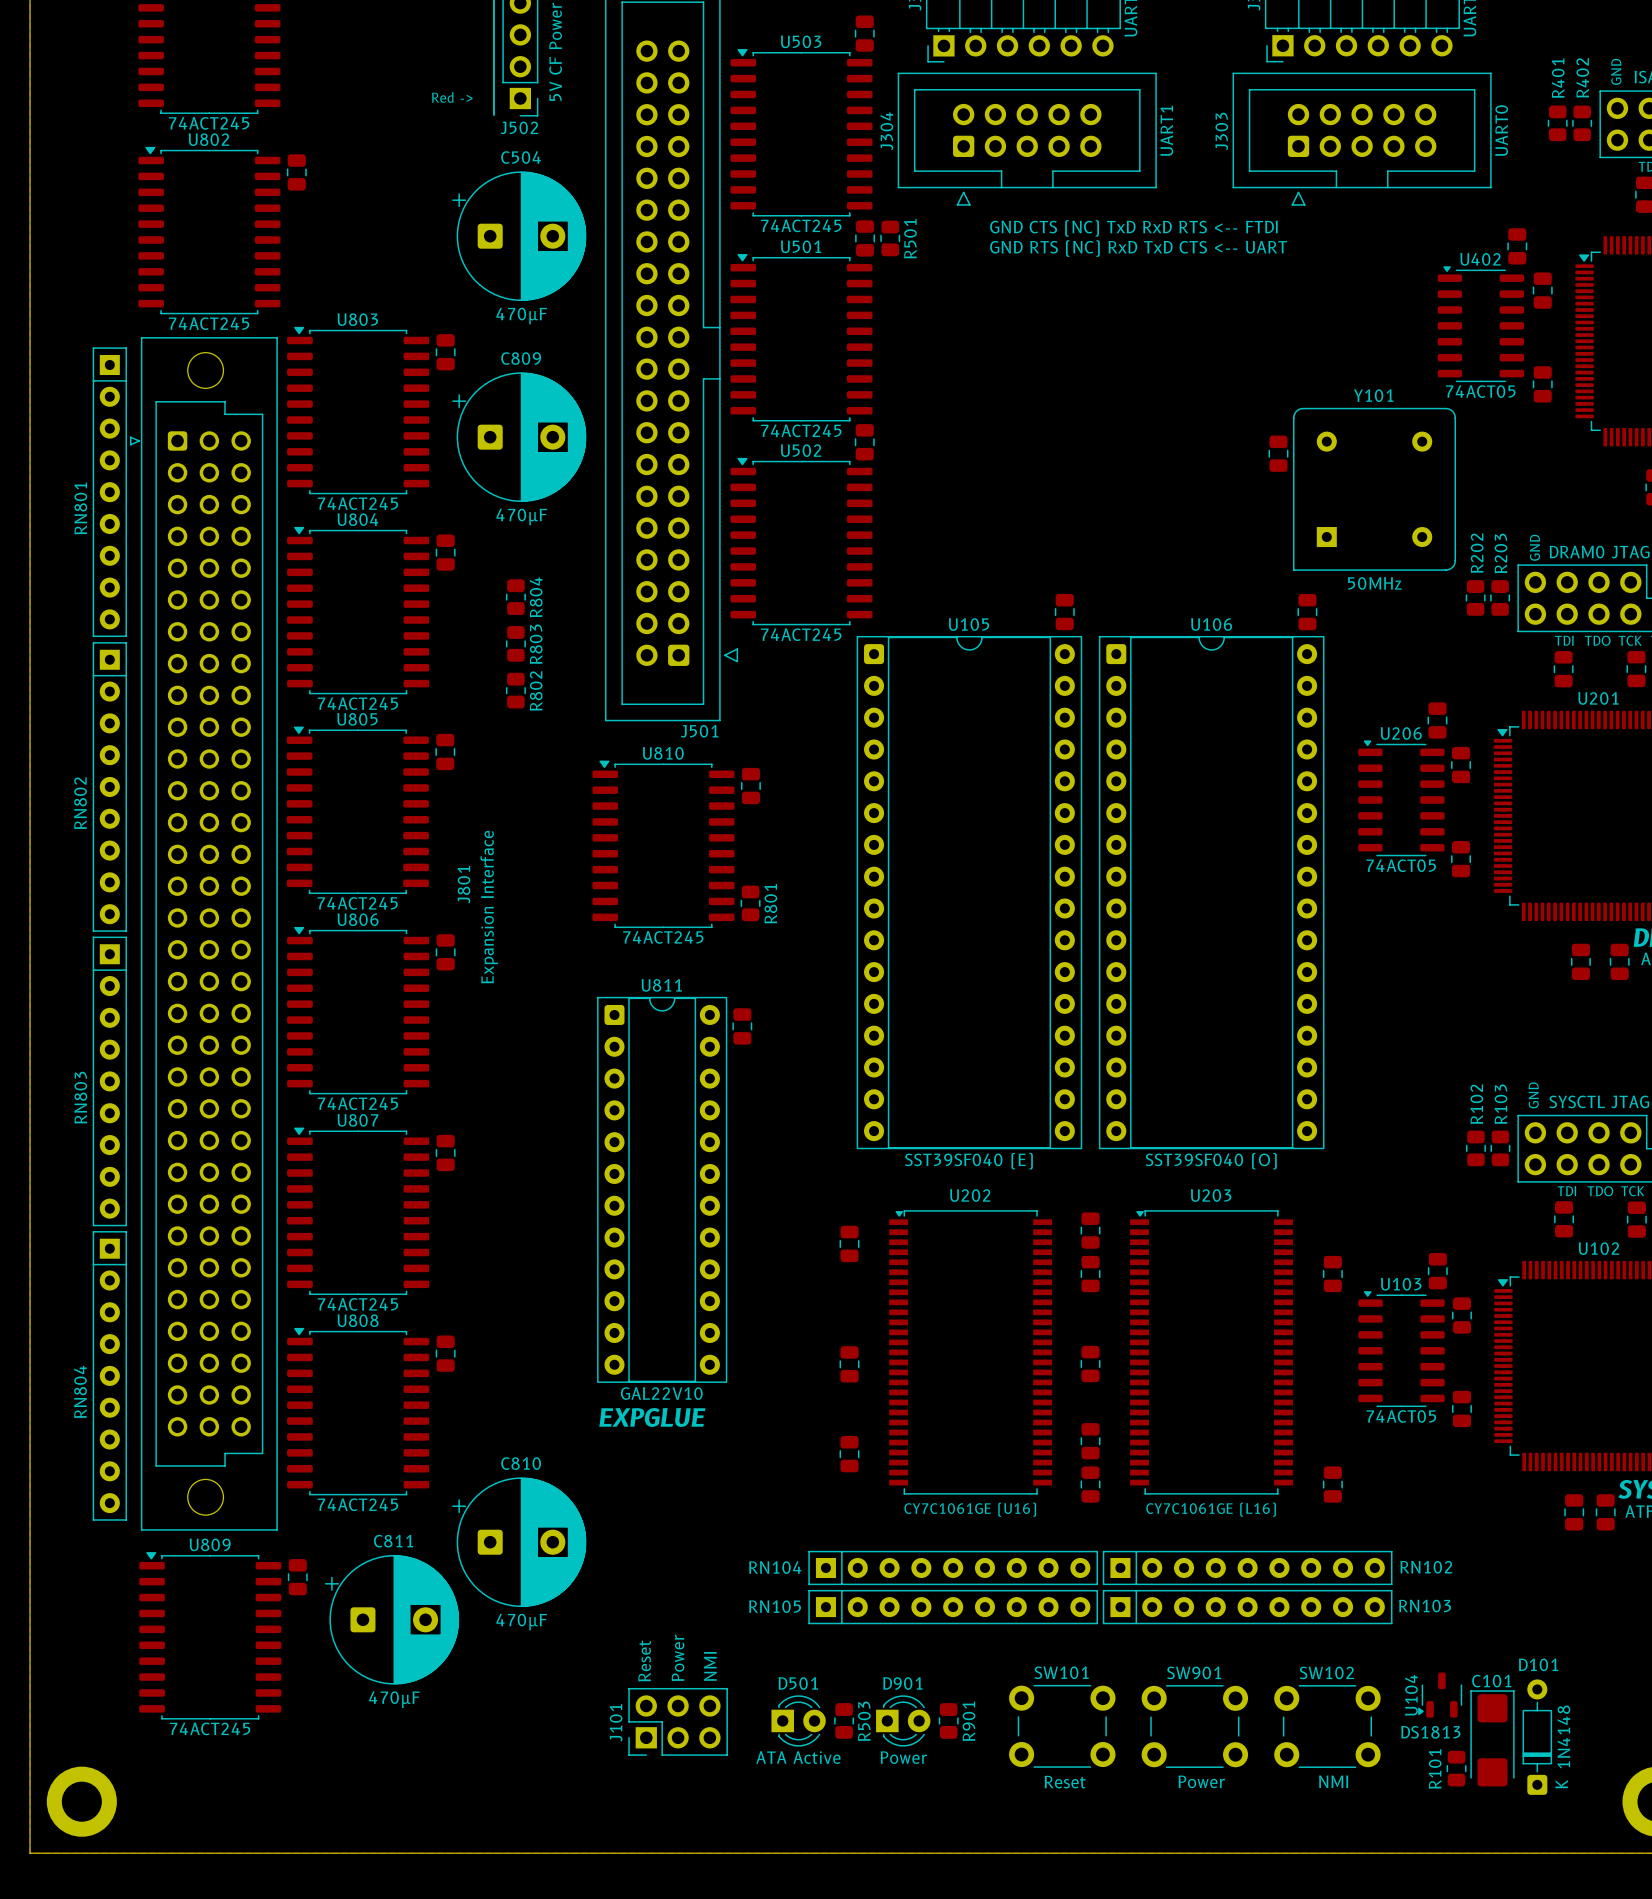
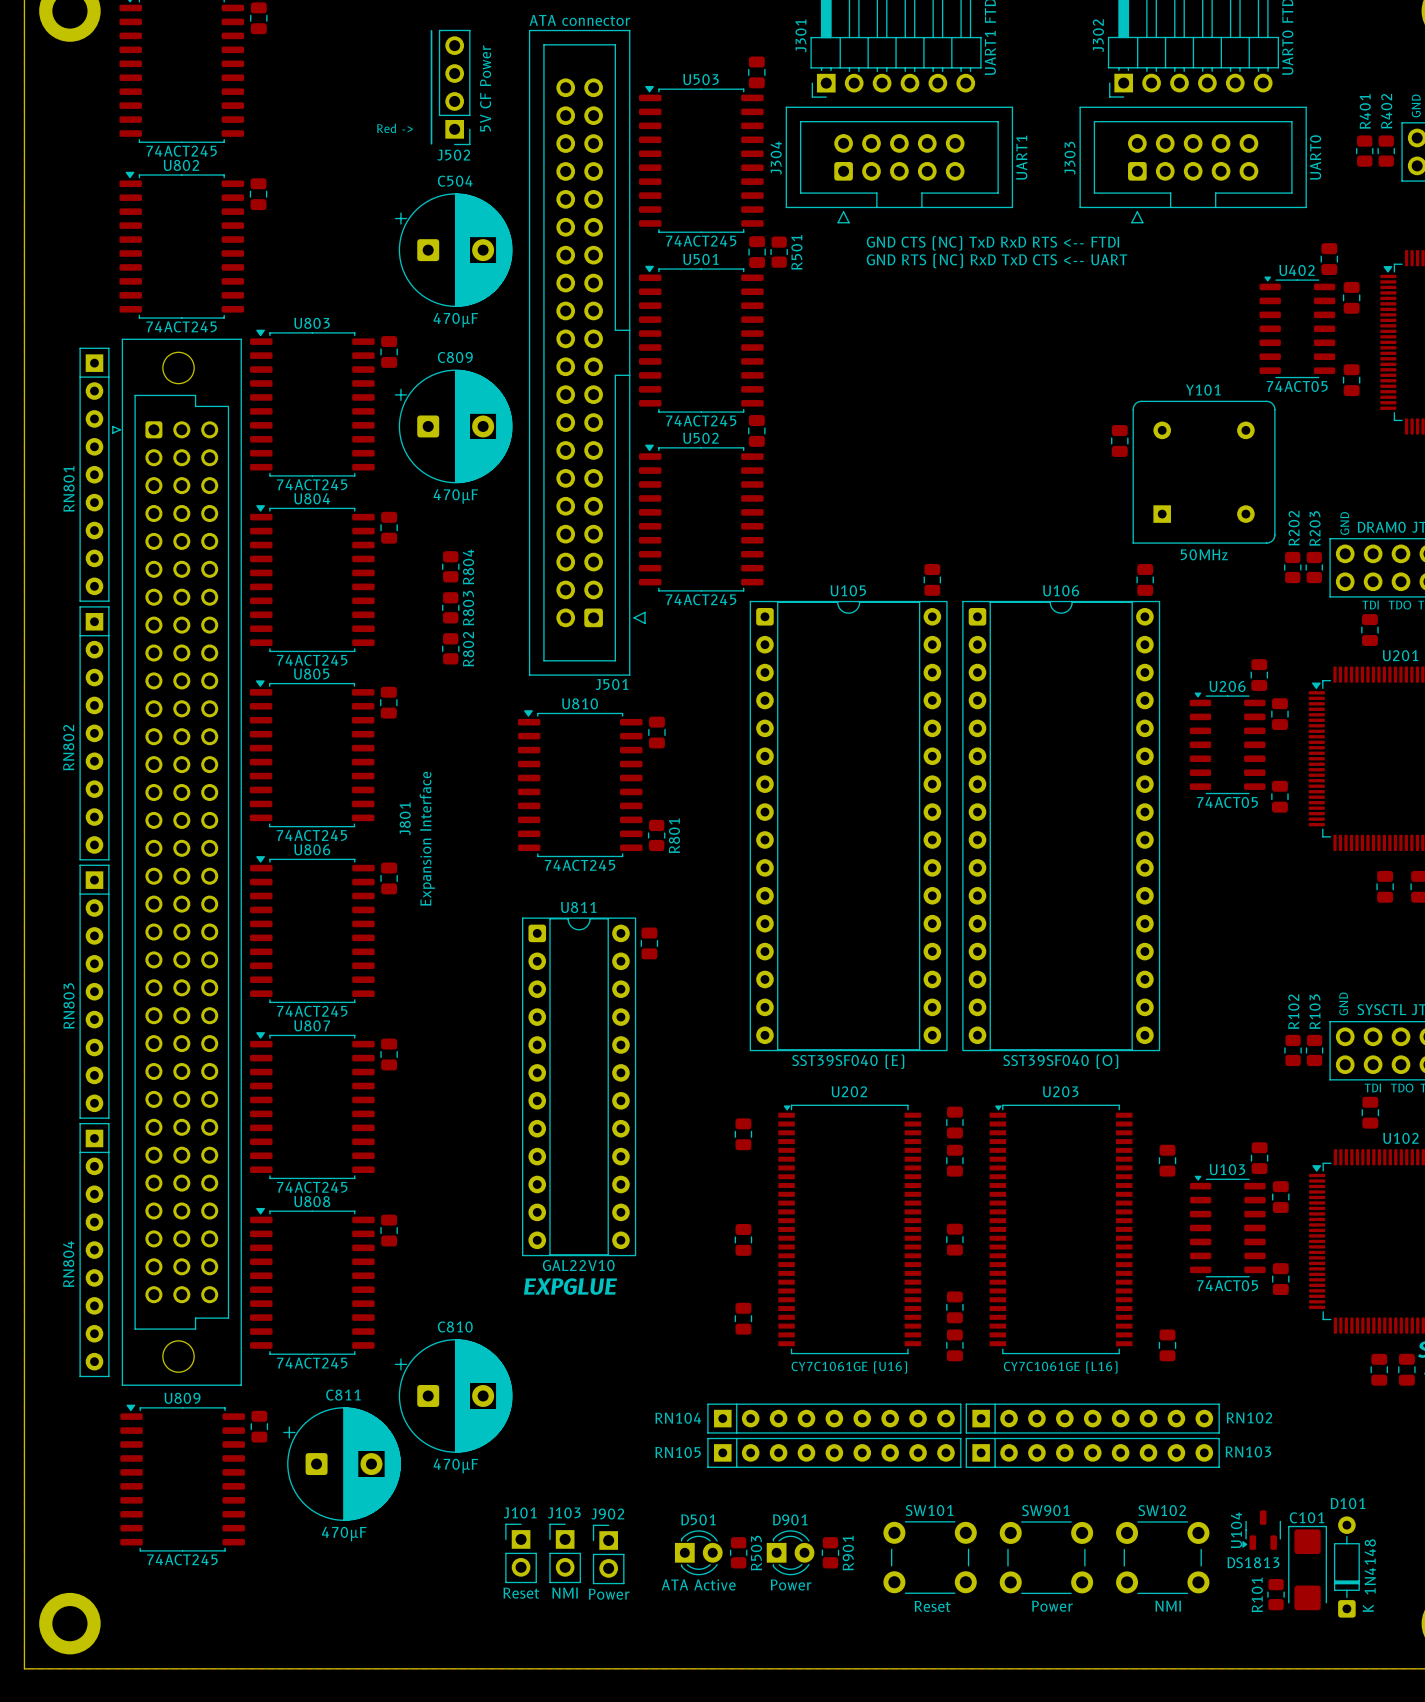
text: Power (678, 1657) -> none
text: Reset (644, 1661) -> none
text: NMI (710, 1666) -> none
J101 footprint: [628, 1687, 728, 1756] -> [505, 1523, 537, 1584]
J103: none -> NMI (565, 1553)
J101 name position: J101 (616, 1722) -> J101 (520, 1512)
J902: none -> Power (608, 1554)
J101 value: none -> Reset (521, 1593)

